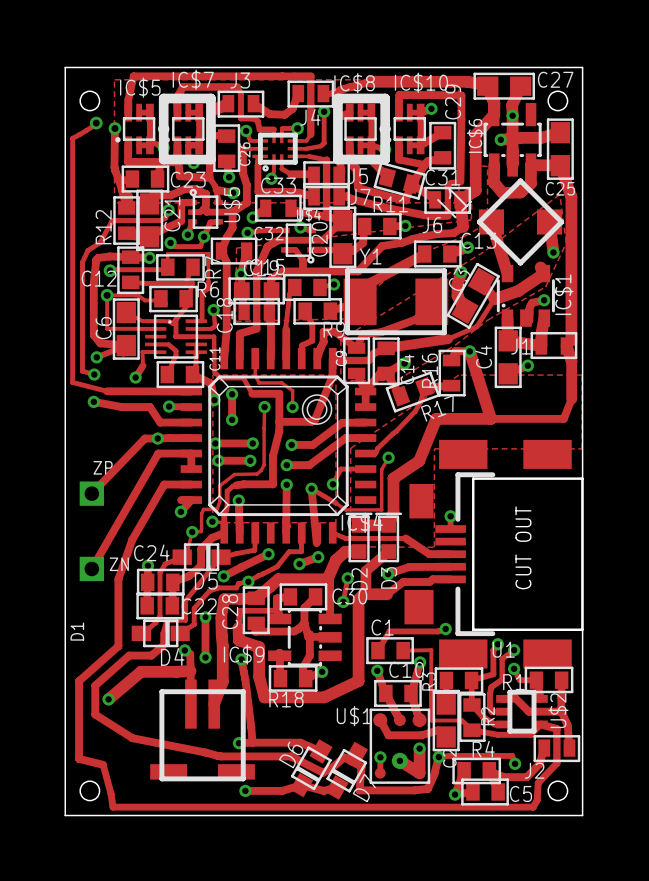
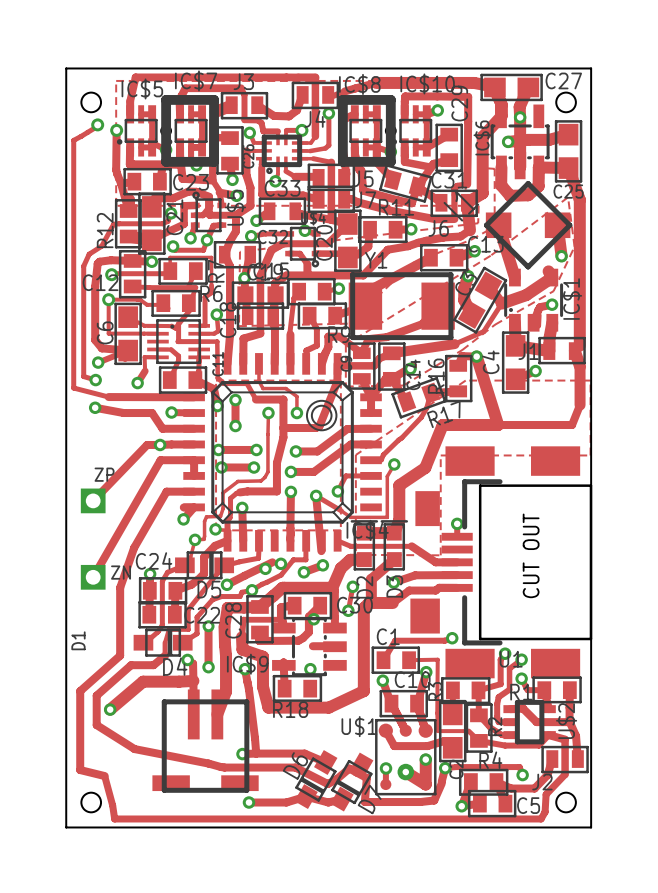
via: (268, 554) -> none
via: none -> (280, 563)
via: none -> (265, 568)
via: none -> (313, 619)
track: (304, 623) (308, 636) (309, 634) (309, 655) (302, 668) (305, 678) (322, 671) -> none
via position: (322, 671) -> (310, 669)

